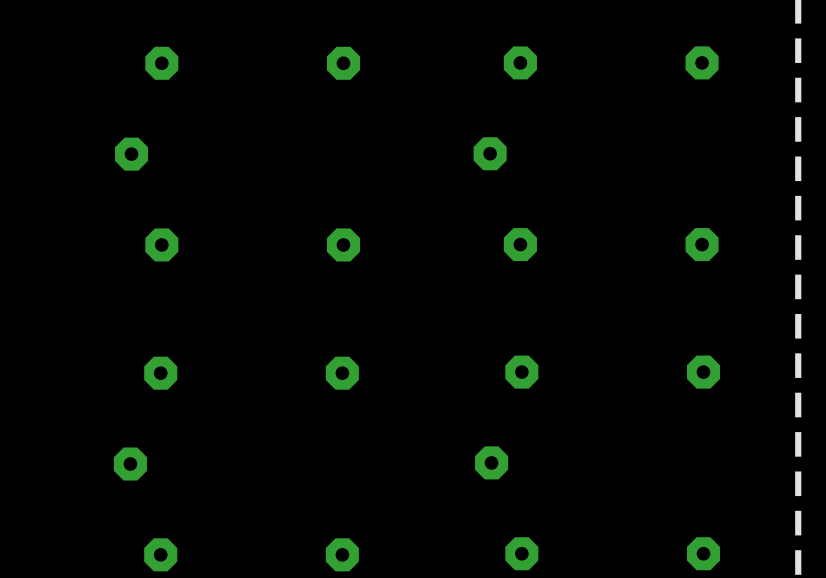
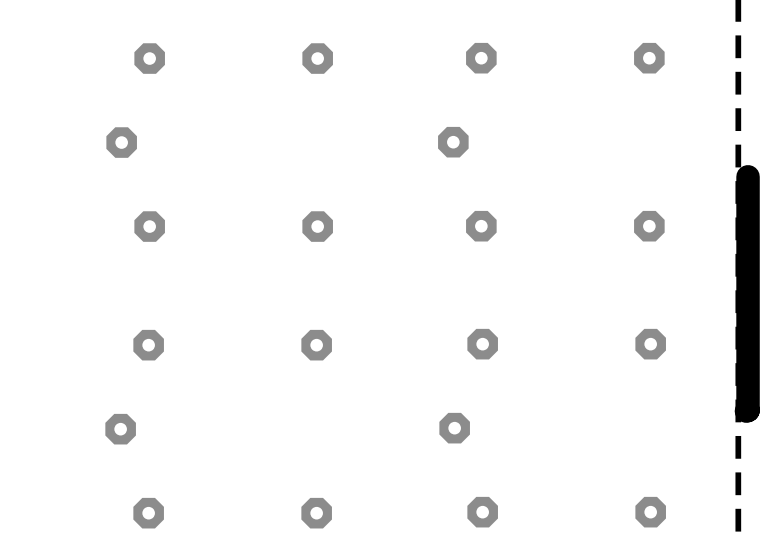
board edge: none -> (748, 176) (748, 410) (746, 411)

